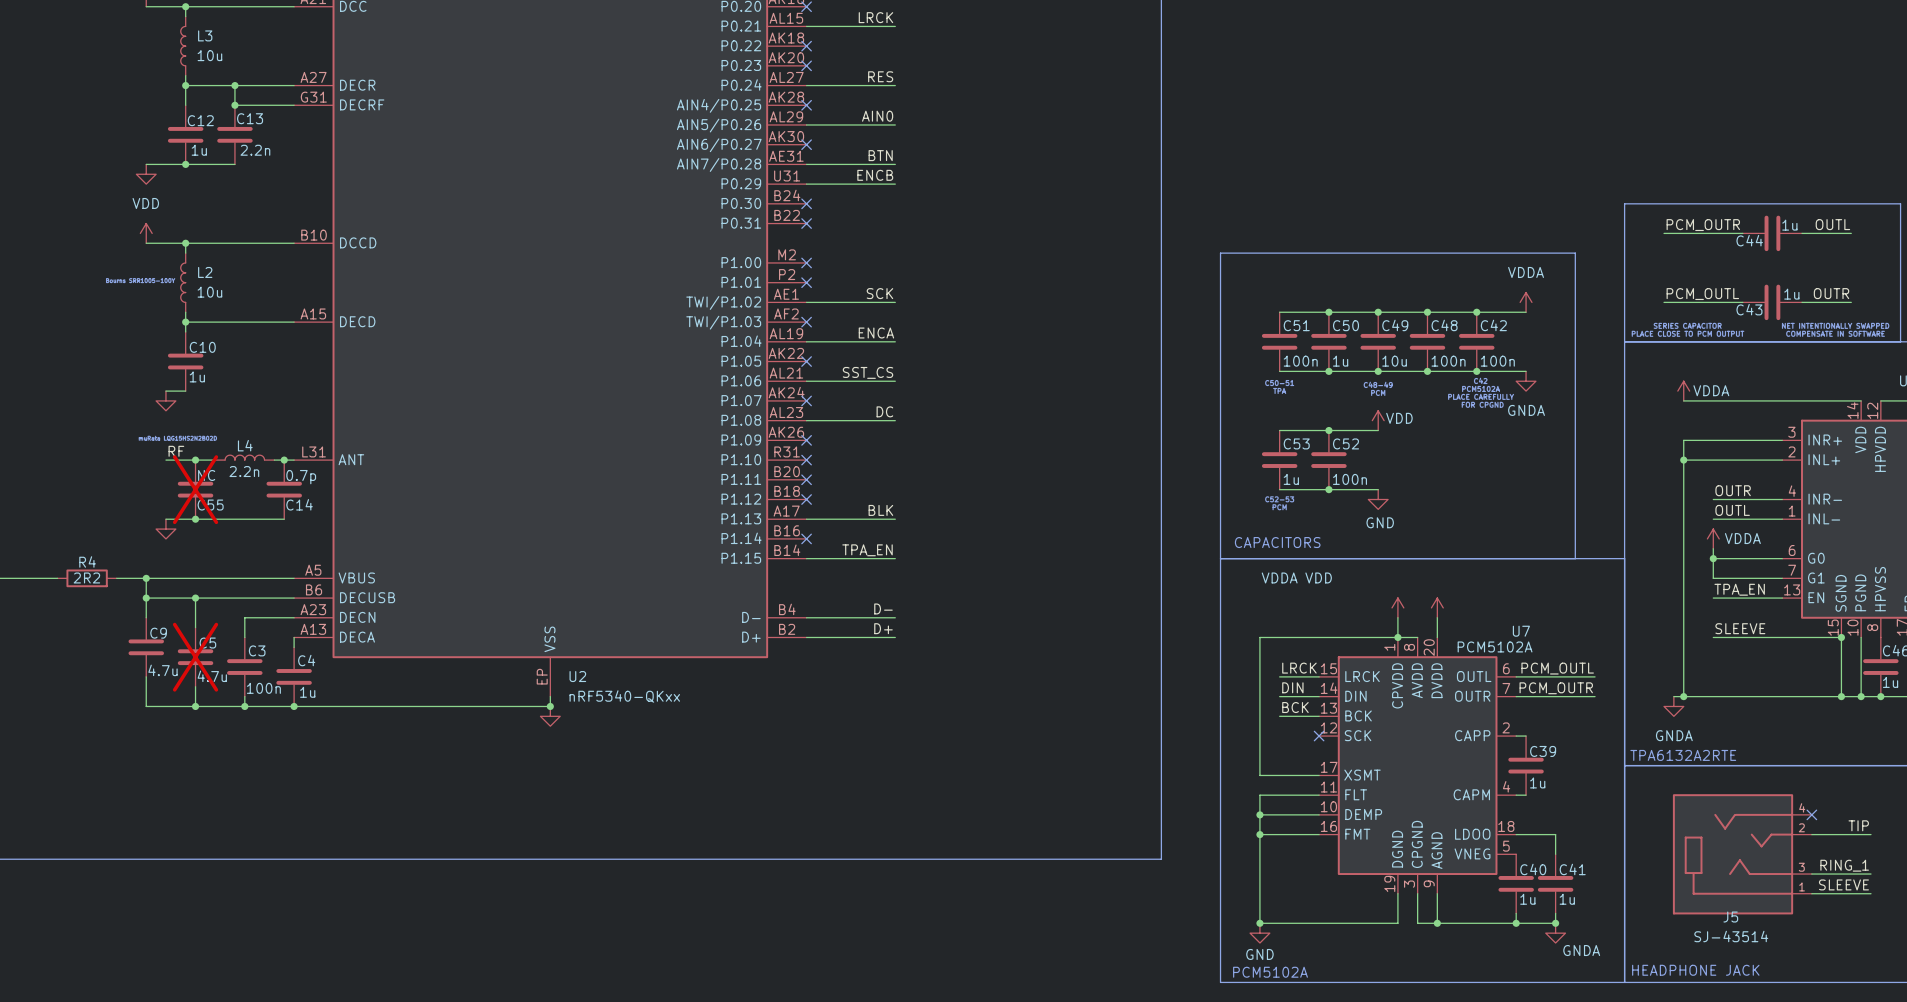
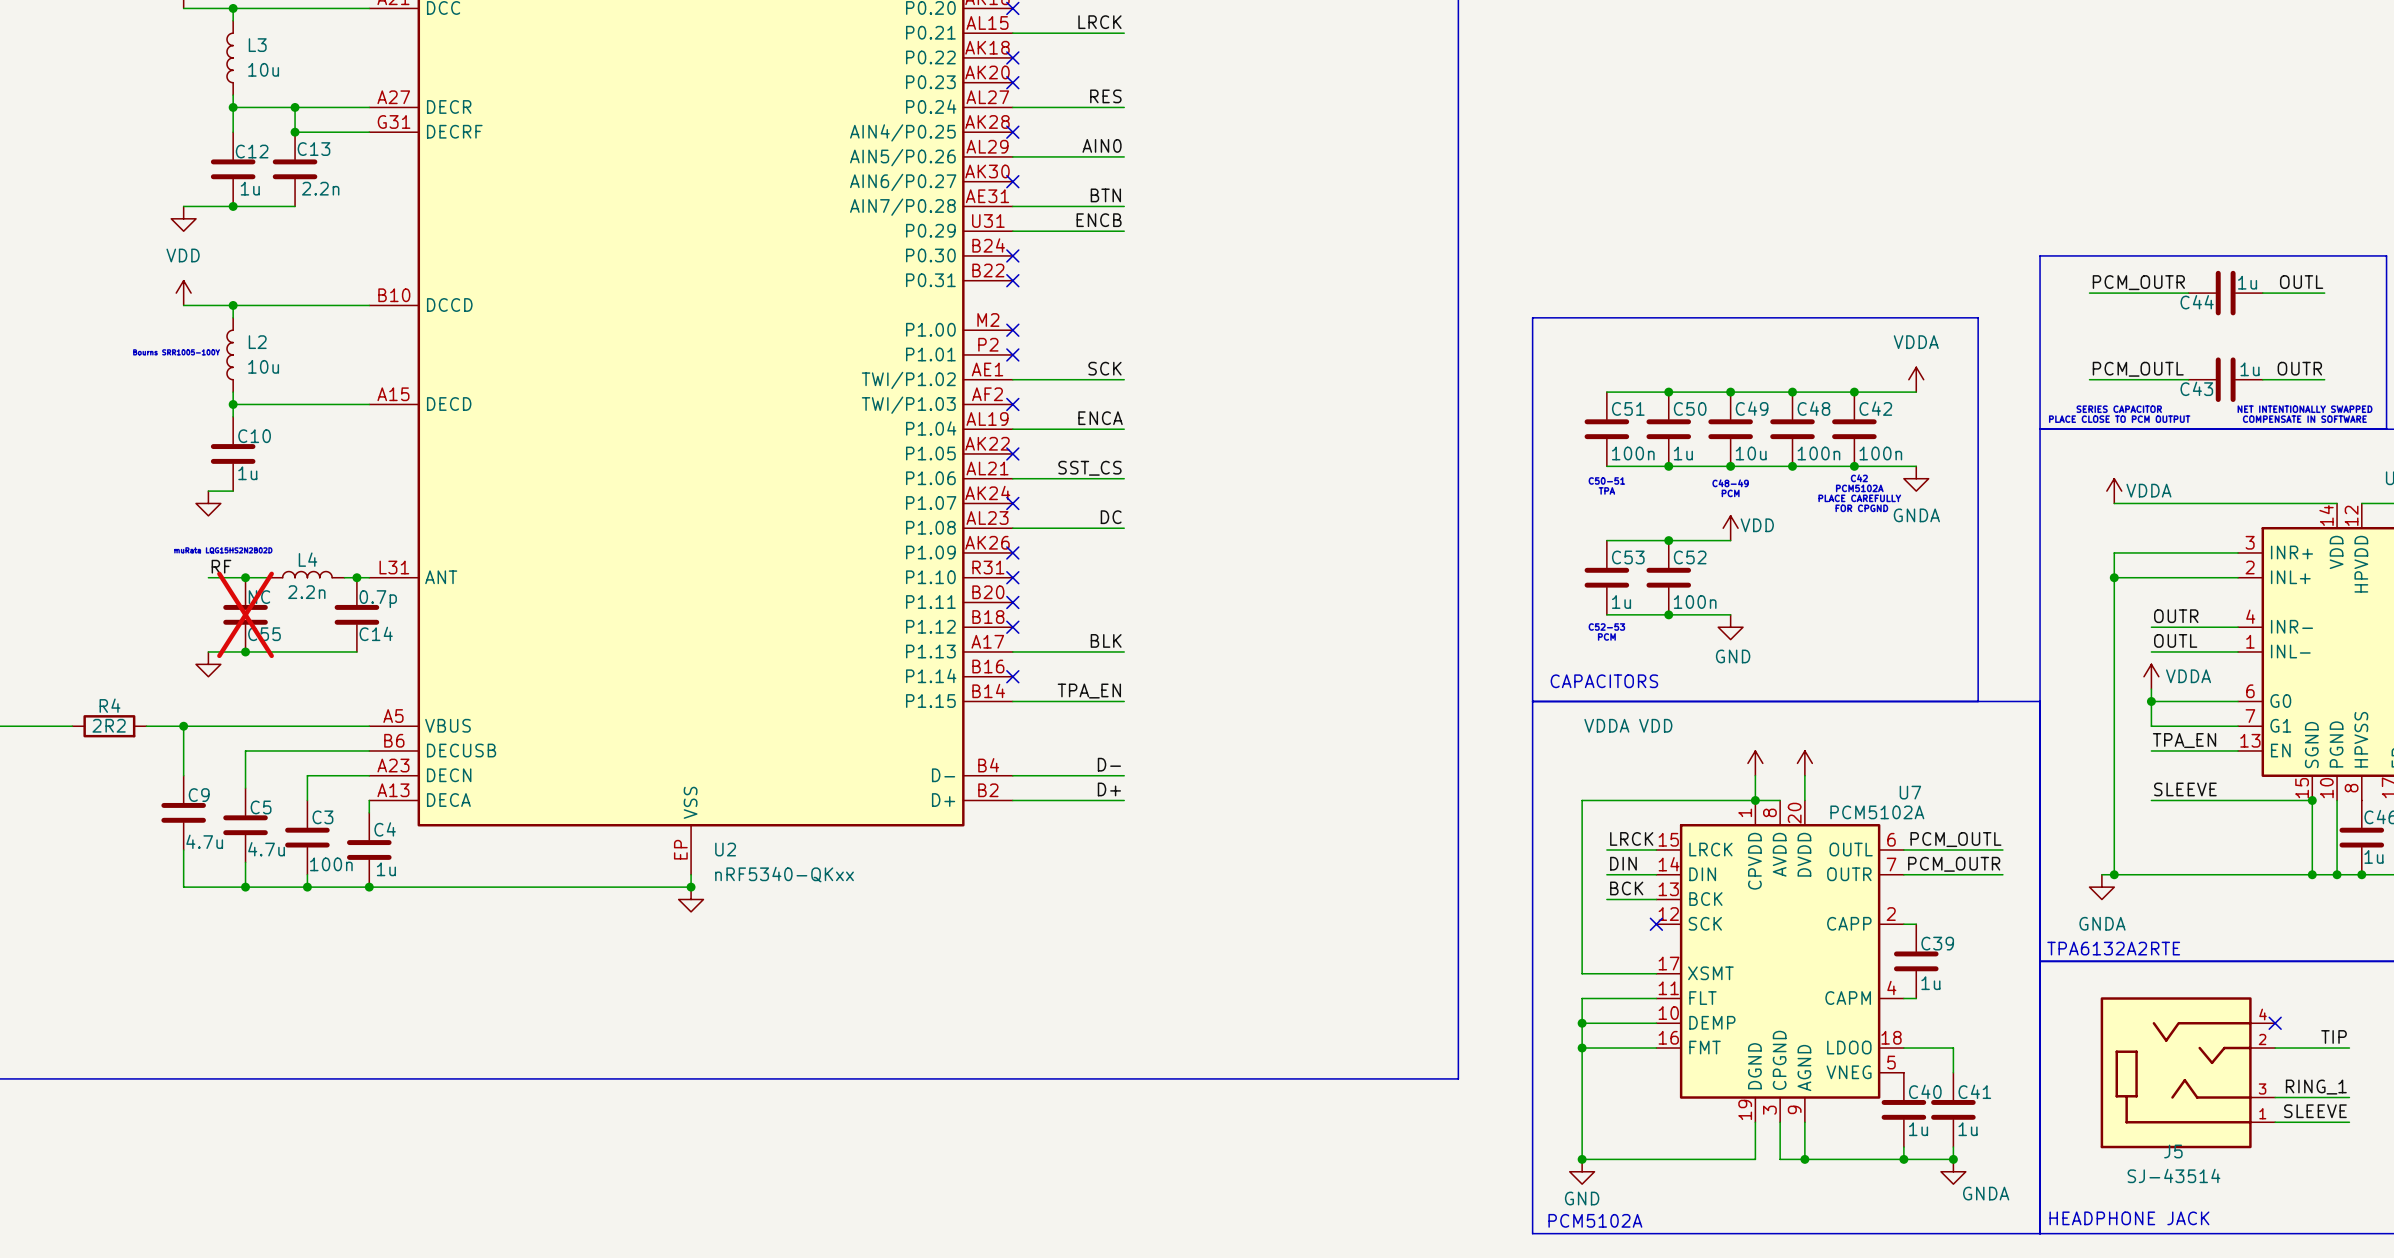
wire: (146, 598) (195, 598) -> none
junction: (146, 598) -> none
junction: (195, 598) -> none
C5 do-not-place cross: (195, 657) -> none

